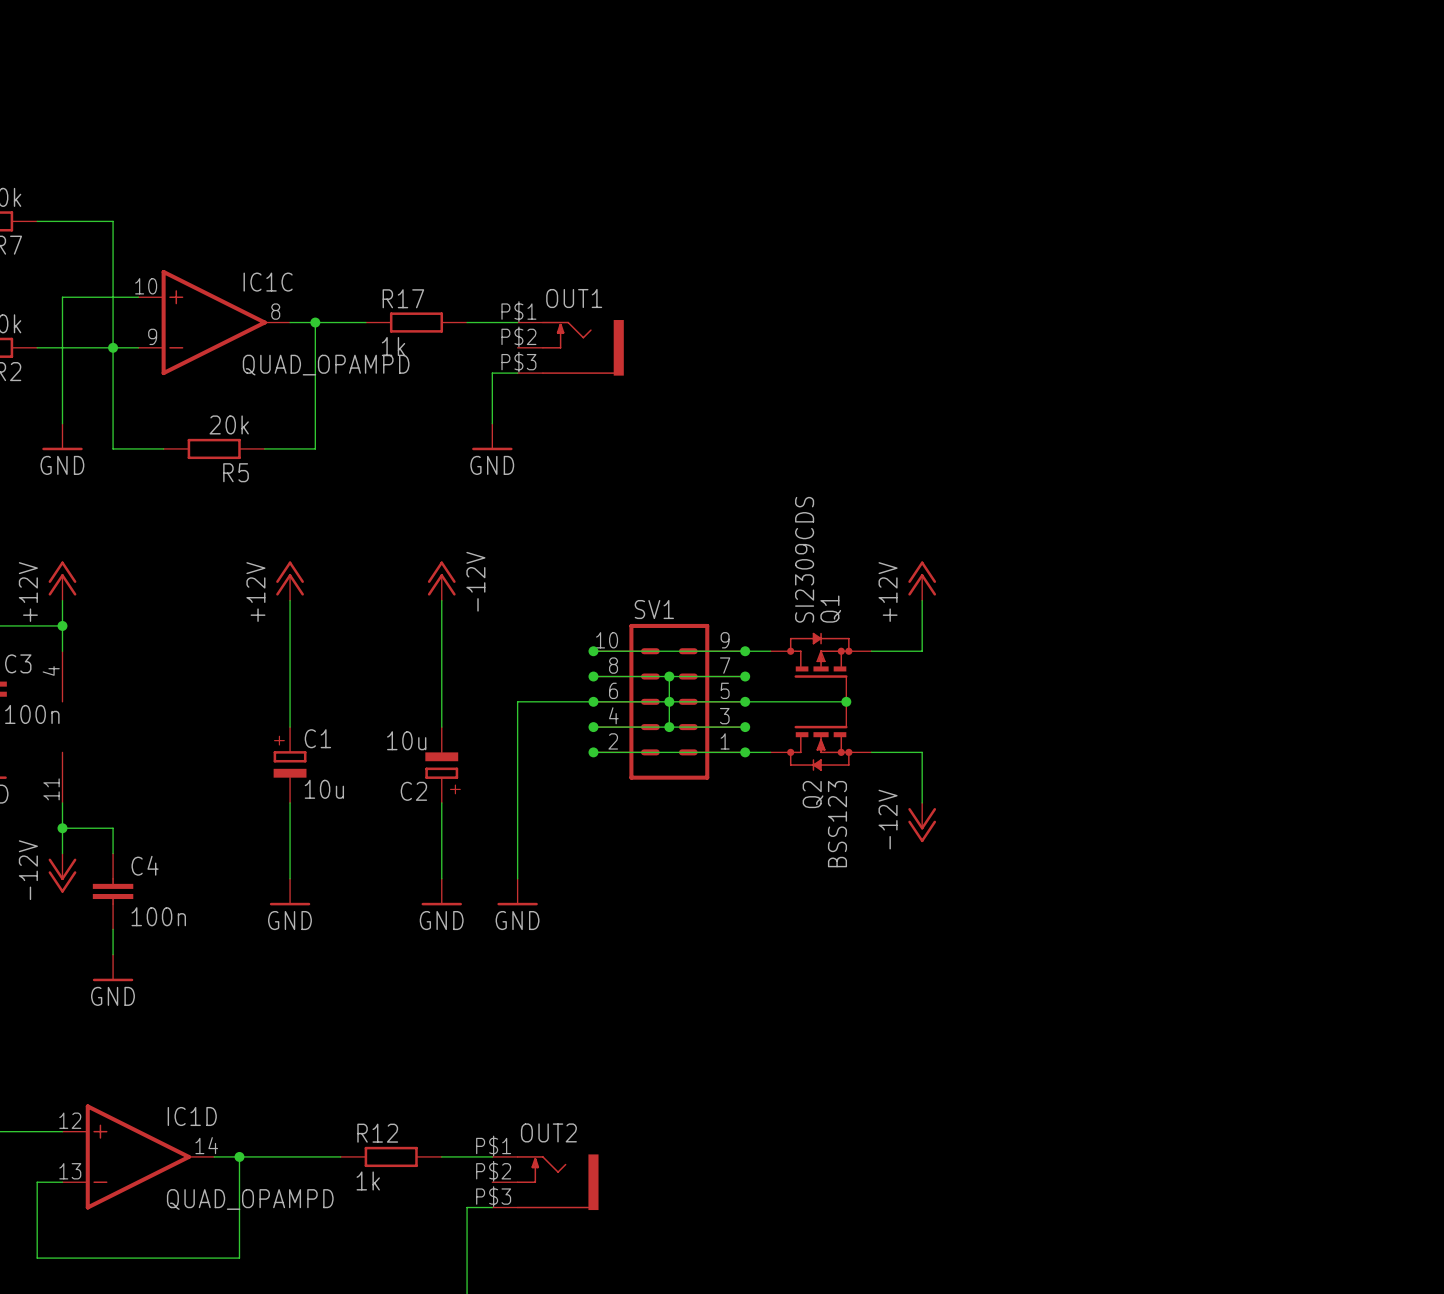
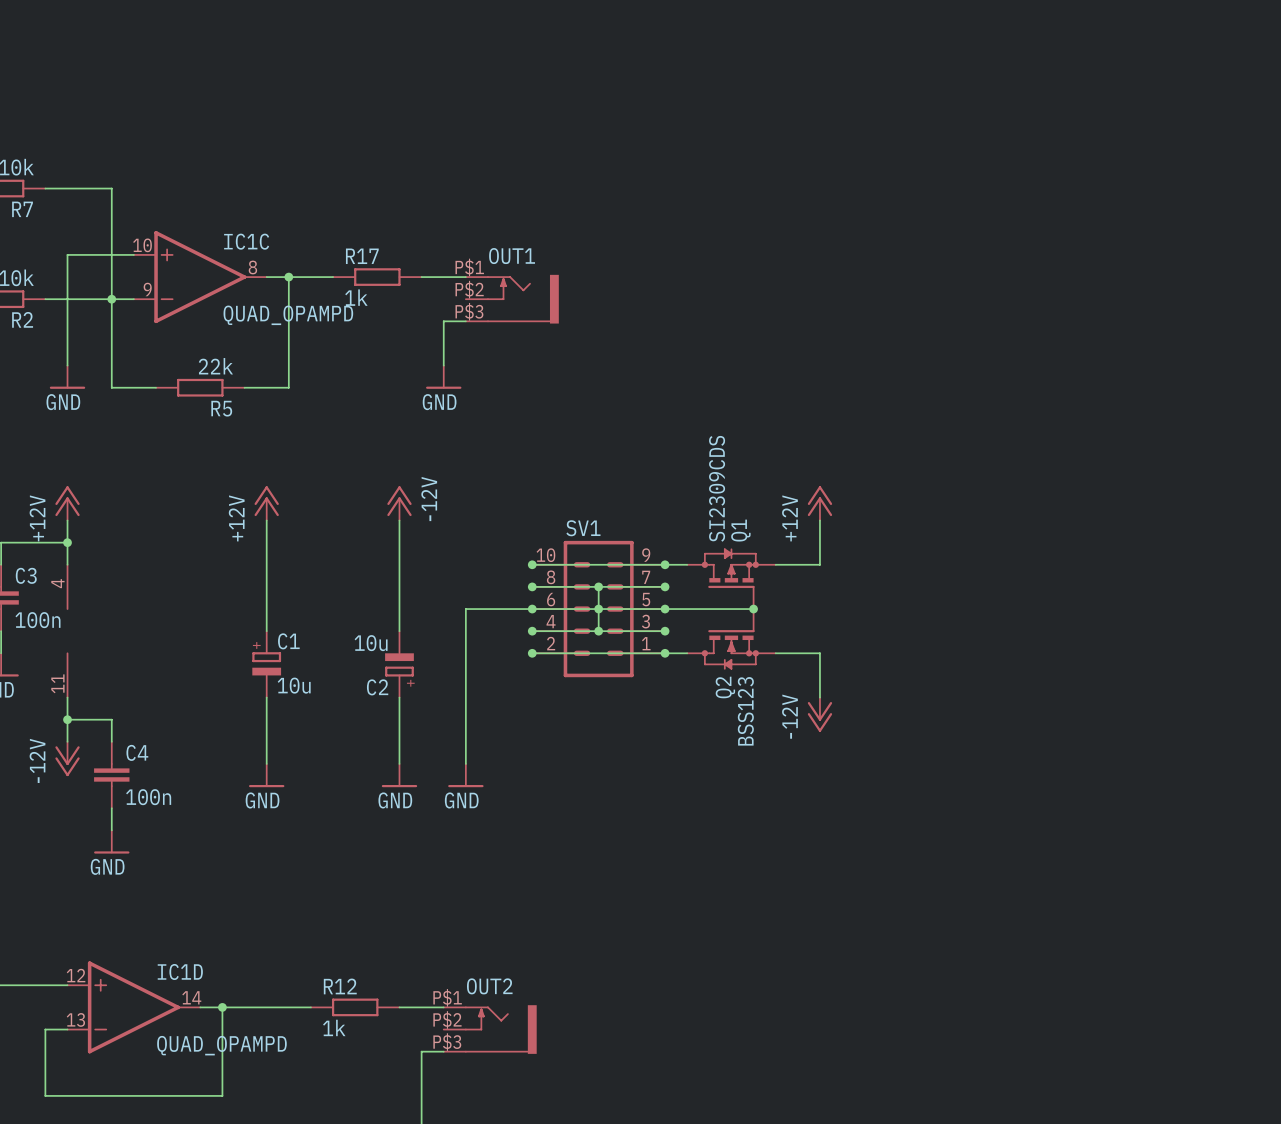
R5 value: 20k (229, 424) -> 22k (215, 366)

